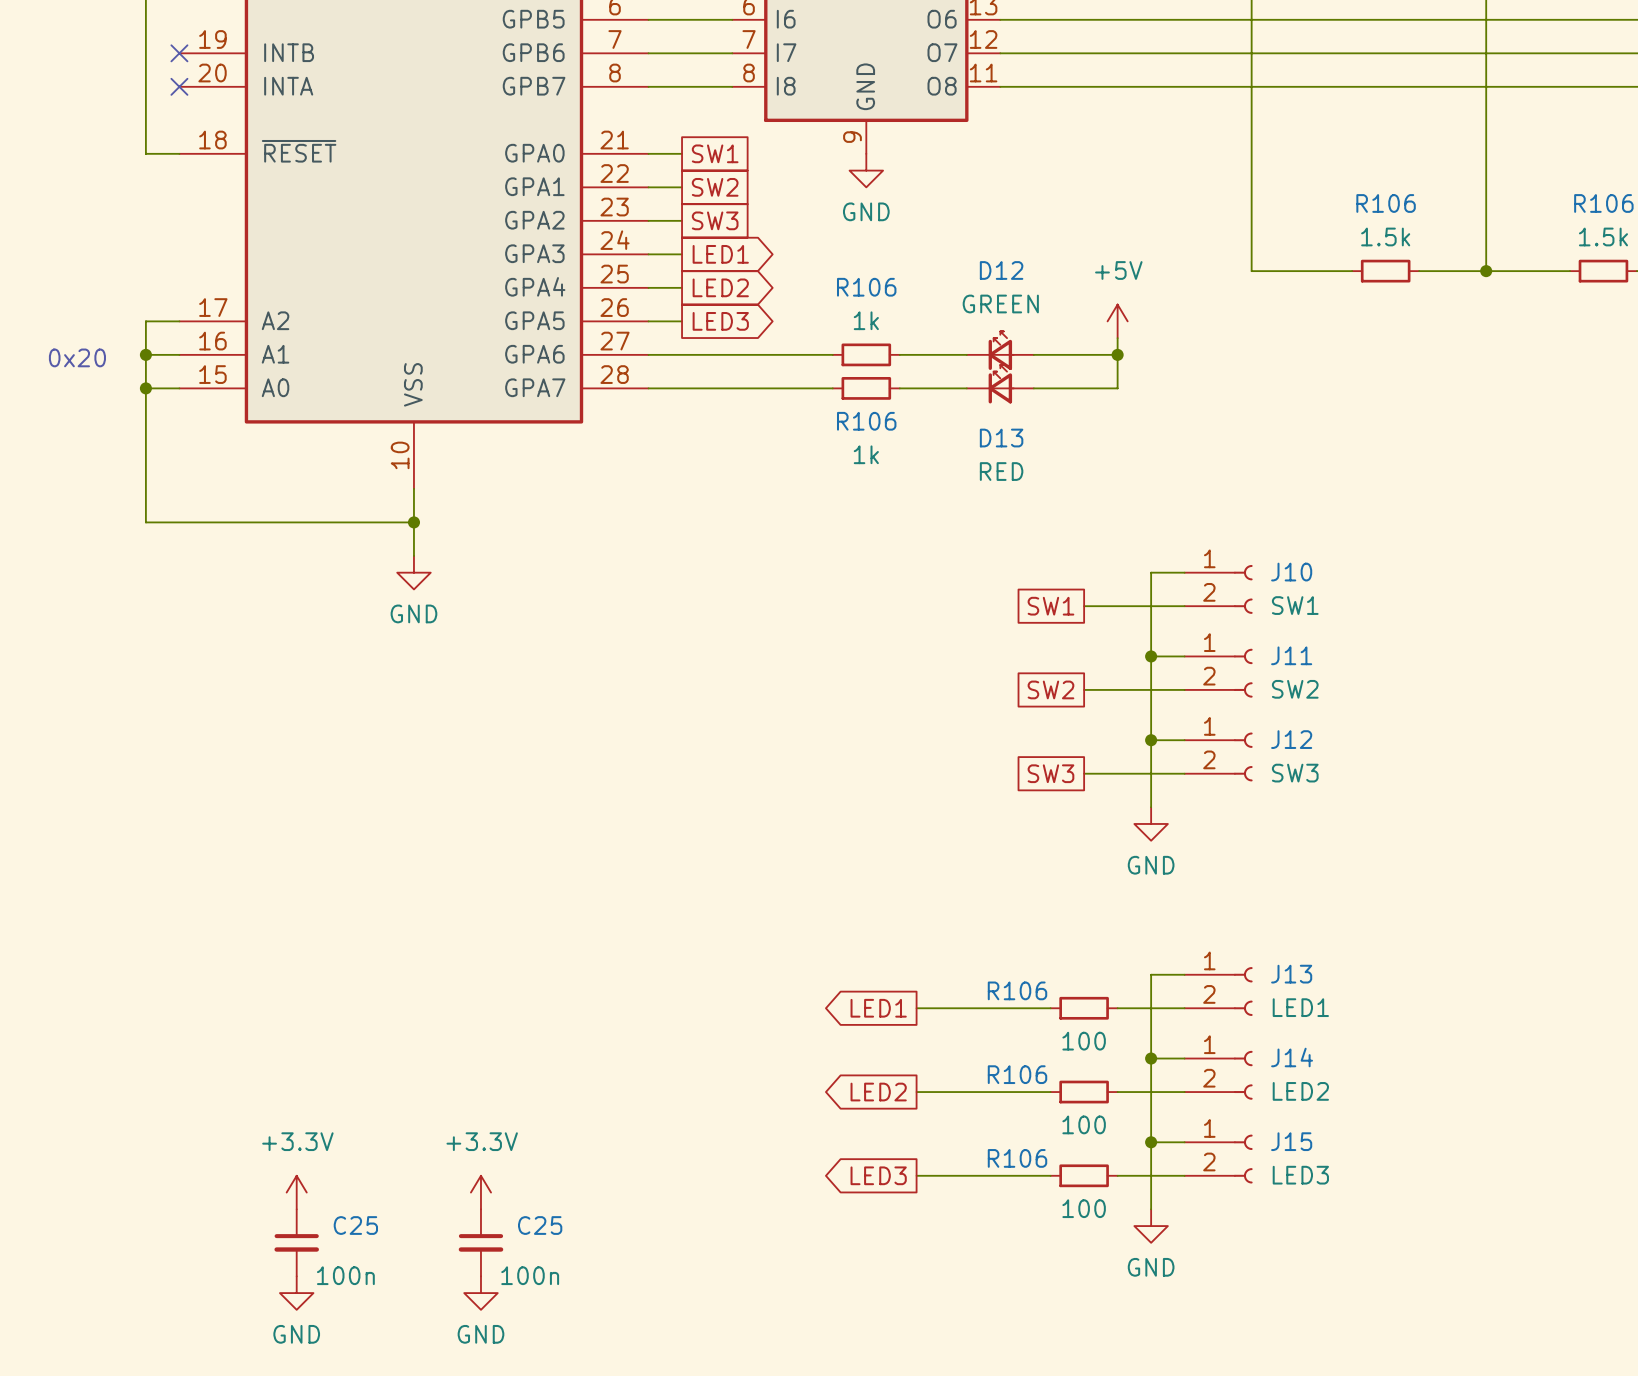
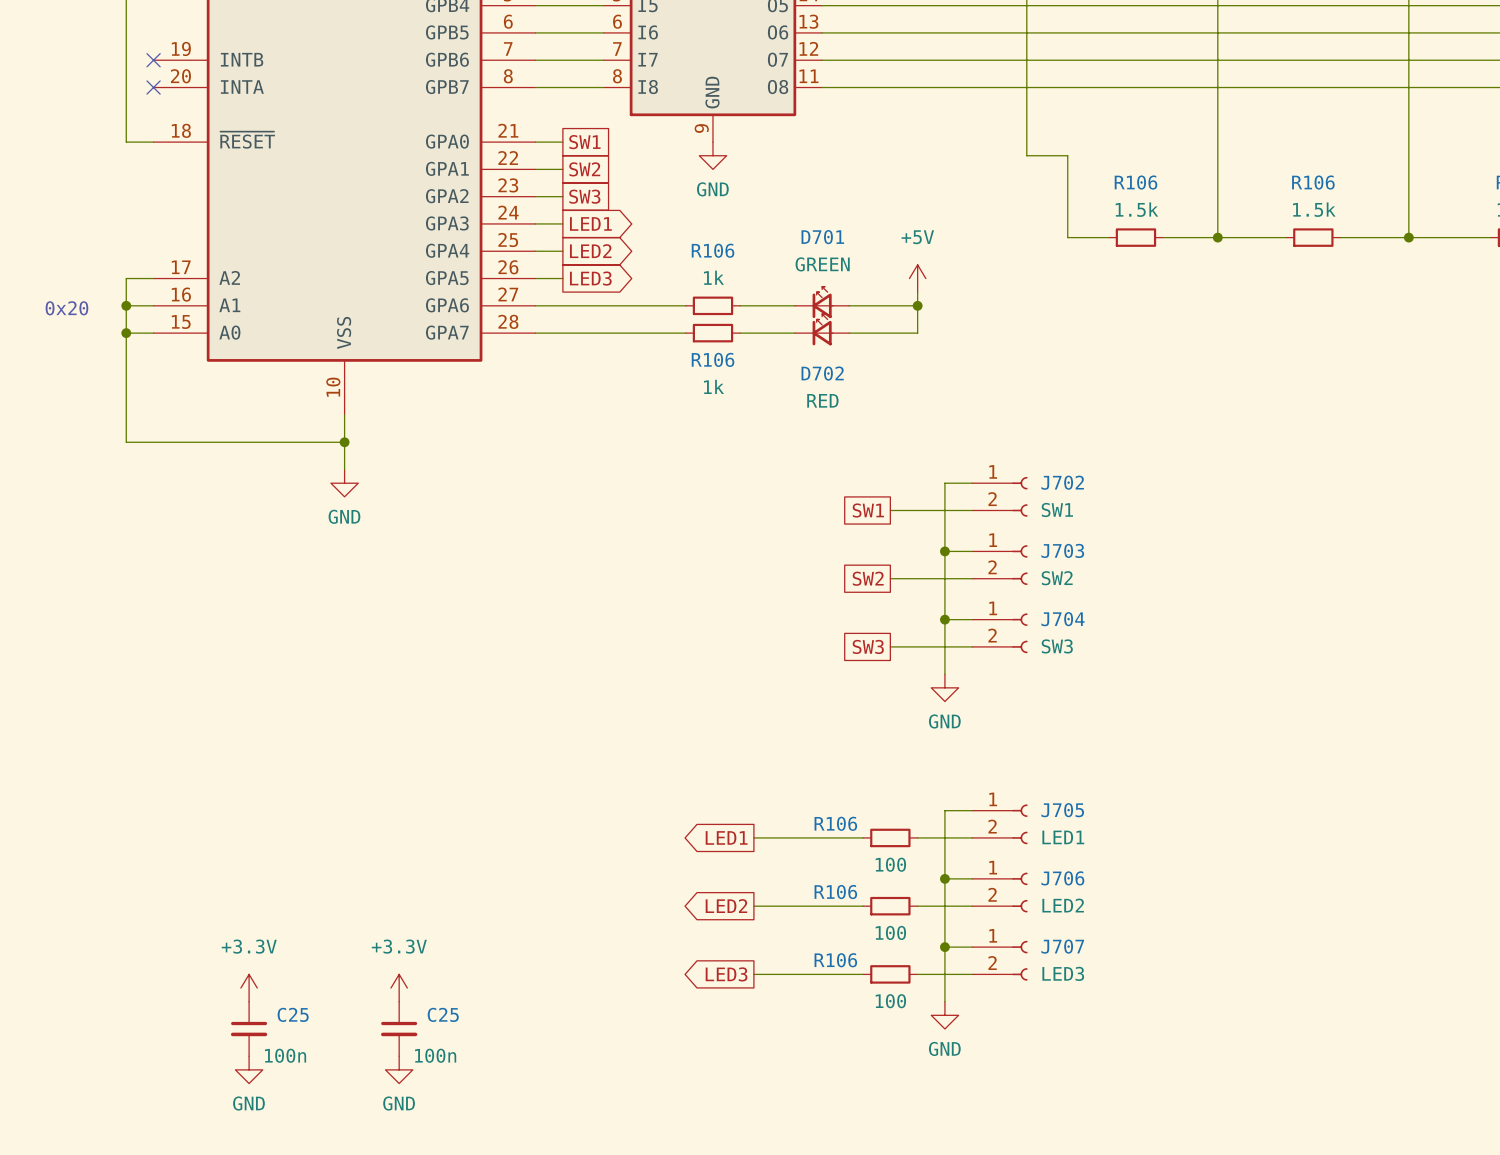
wire: (1251, 170) (1251, 271) (1301, 271) -> (1026, 155) (1067, 155) (1067, 237)
D12 name: D12 (1001, 270) -> D701 (822, 237)
D13 name: D13 (1001, 438) -> D702 (822, 373)
J10 name: J10 (1291, 572) -> J702 (1062, 482)
J11 name: J11 (1291, 655) -> J703 (1062, 550)
J12 name: J12 (1291, 739) -> J704 (1063, 619)
J13 name: J13 (1291, 974) -> J705 (1062, 810)
J14 name: J14 (1292, 1057) -> J706 (1062, 878)
J15 name: J15 (1291, 1141) -> J707 (1062, 946)

